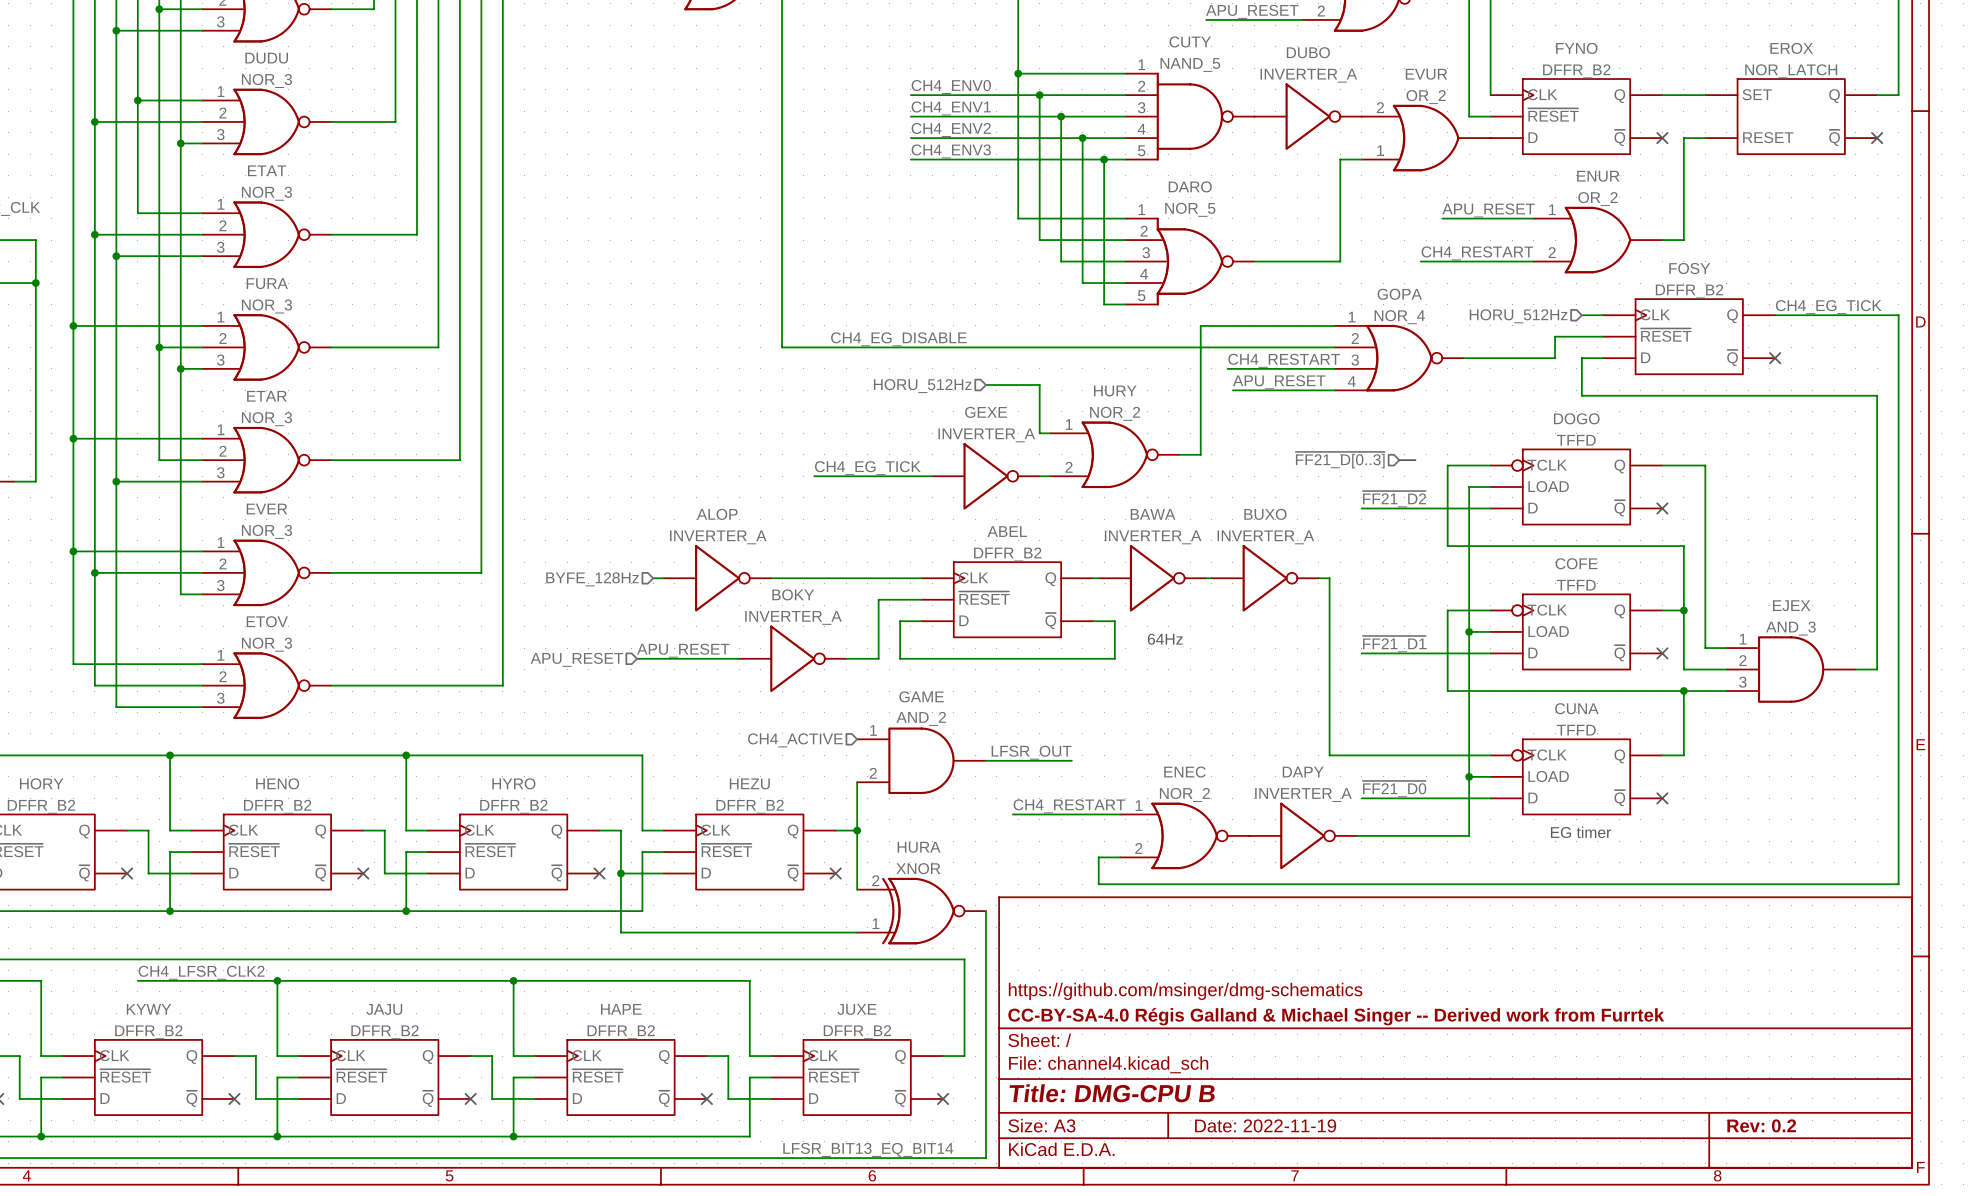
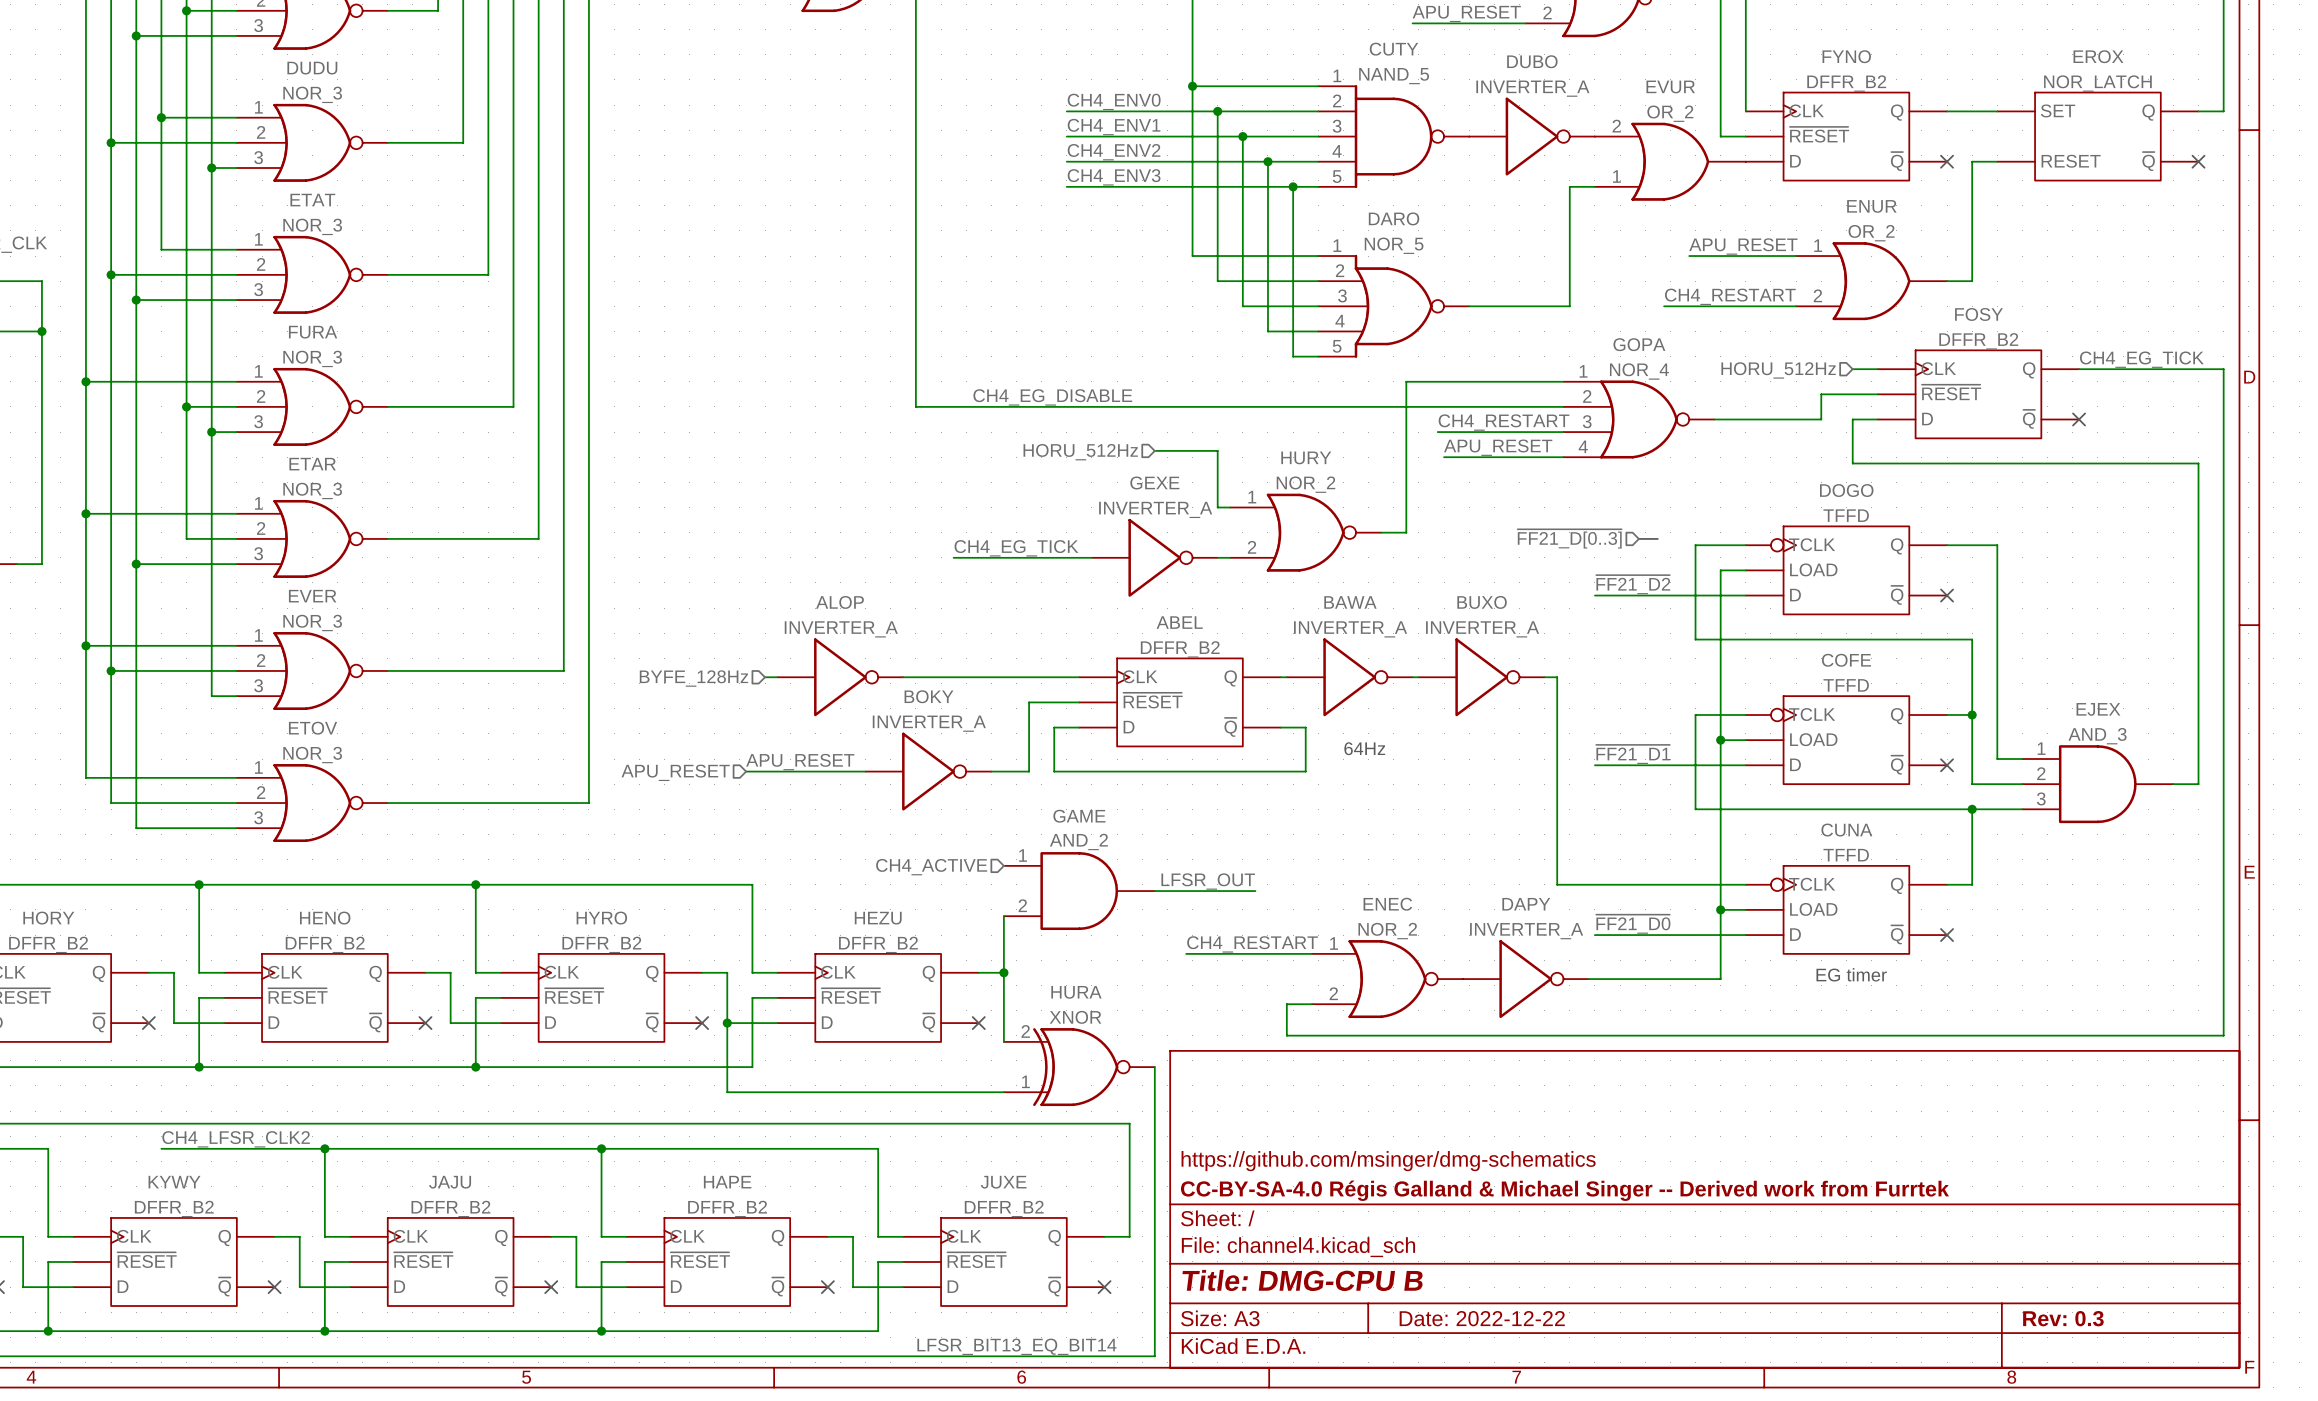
title block: Date: 2022-11-19 (1265, 1125) -> Date: 2022-12-22 (1482, 1318)
title block: Rev: 0.2 (1761, 1125) -> Rev: 0.3 (2063, 1318)

